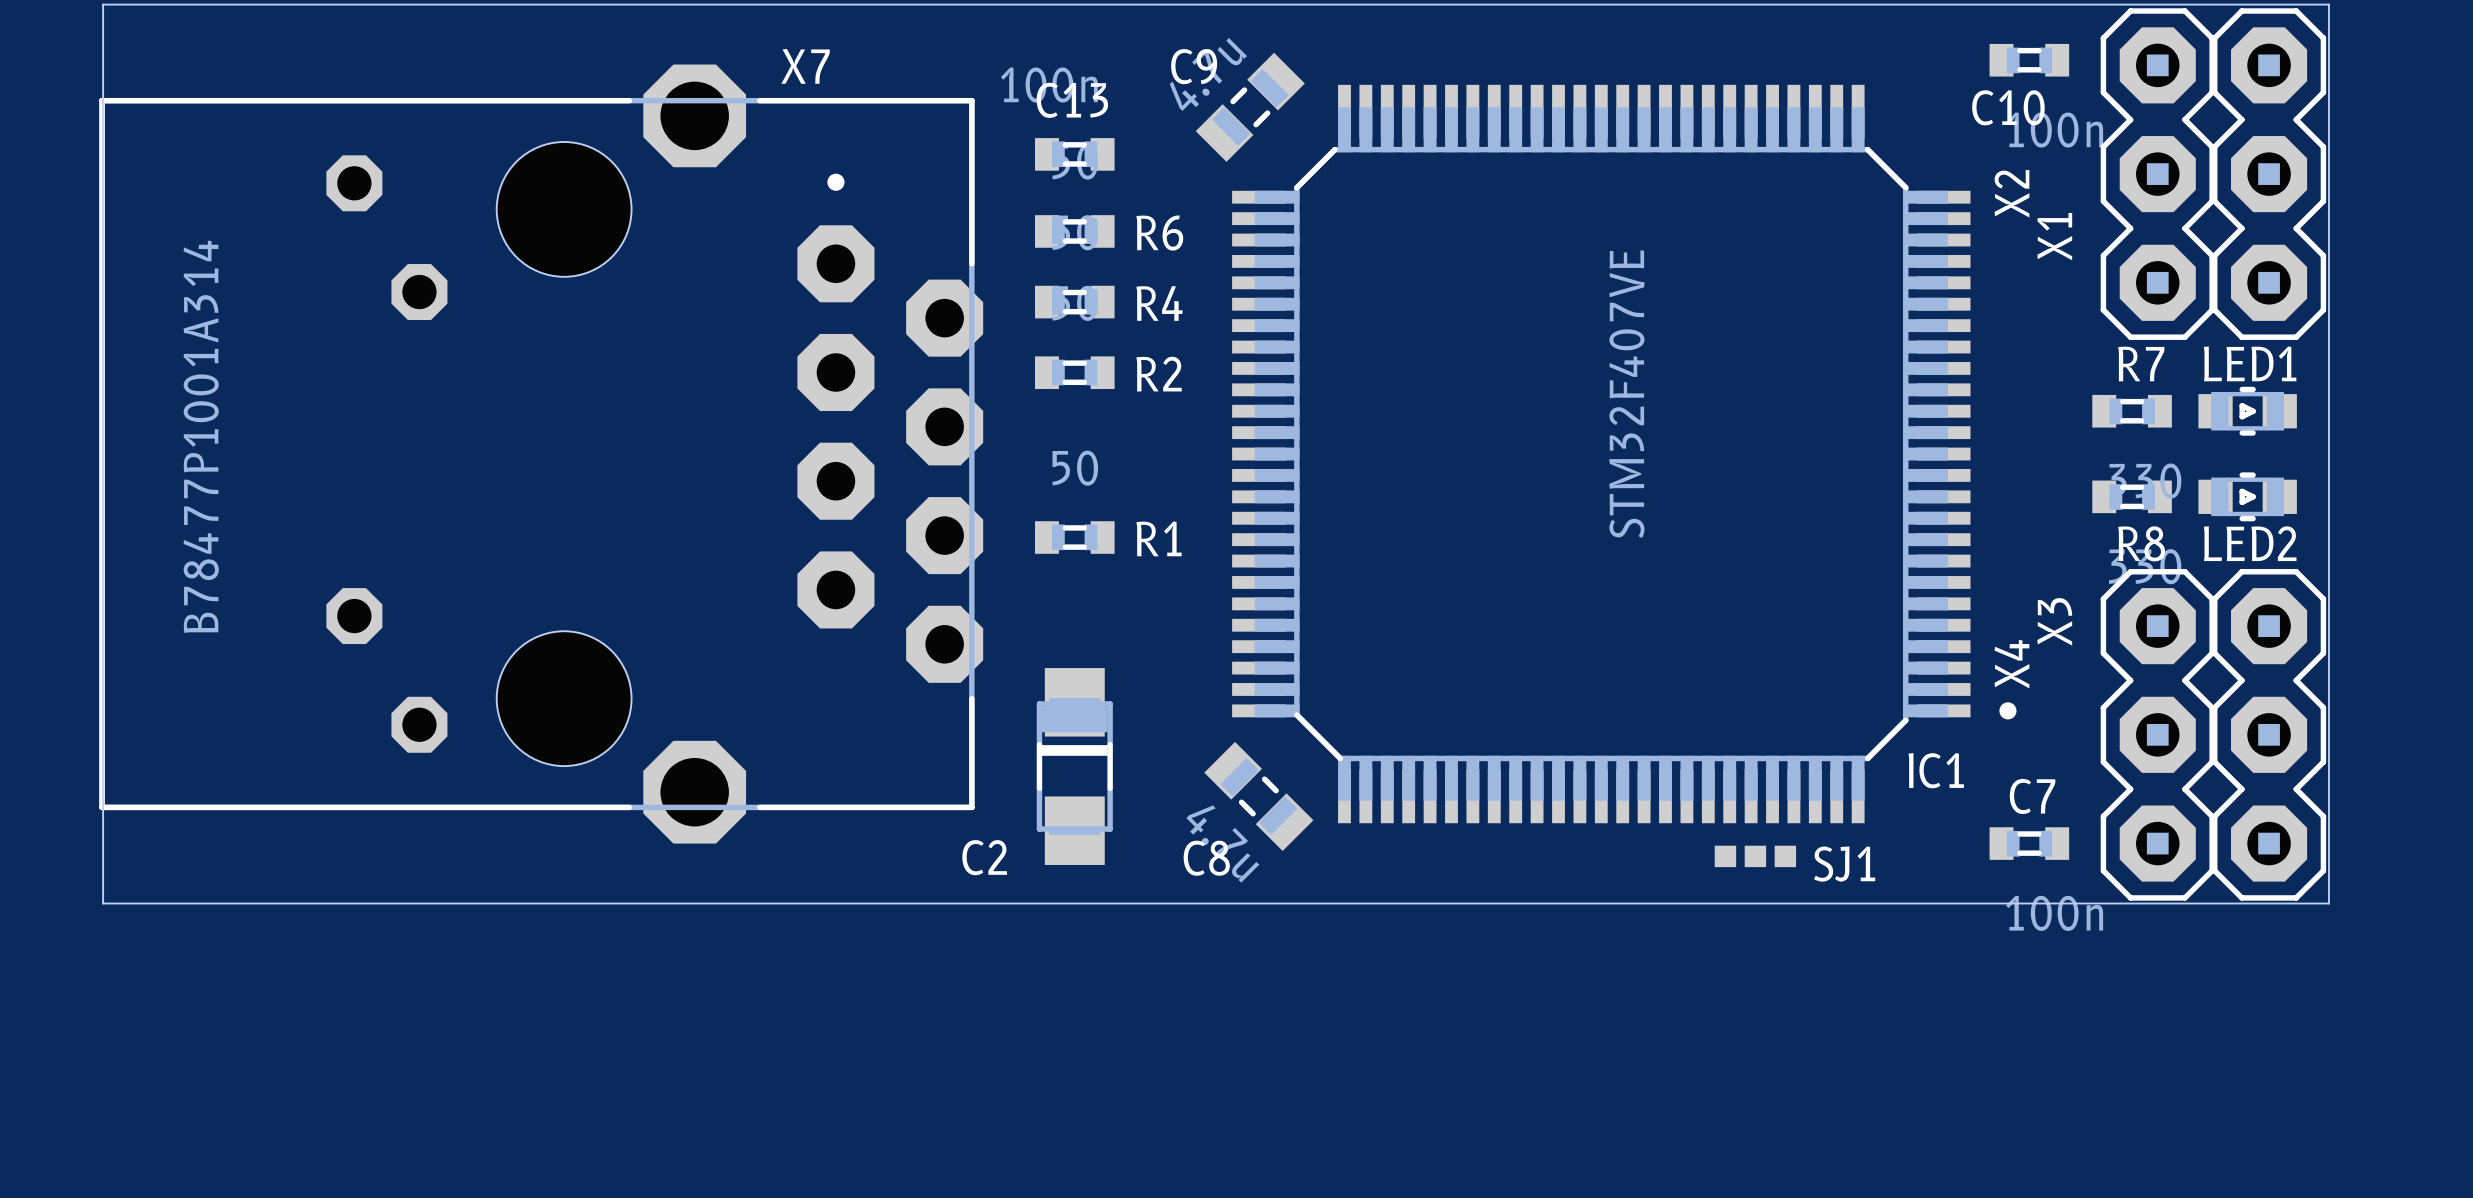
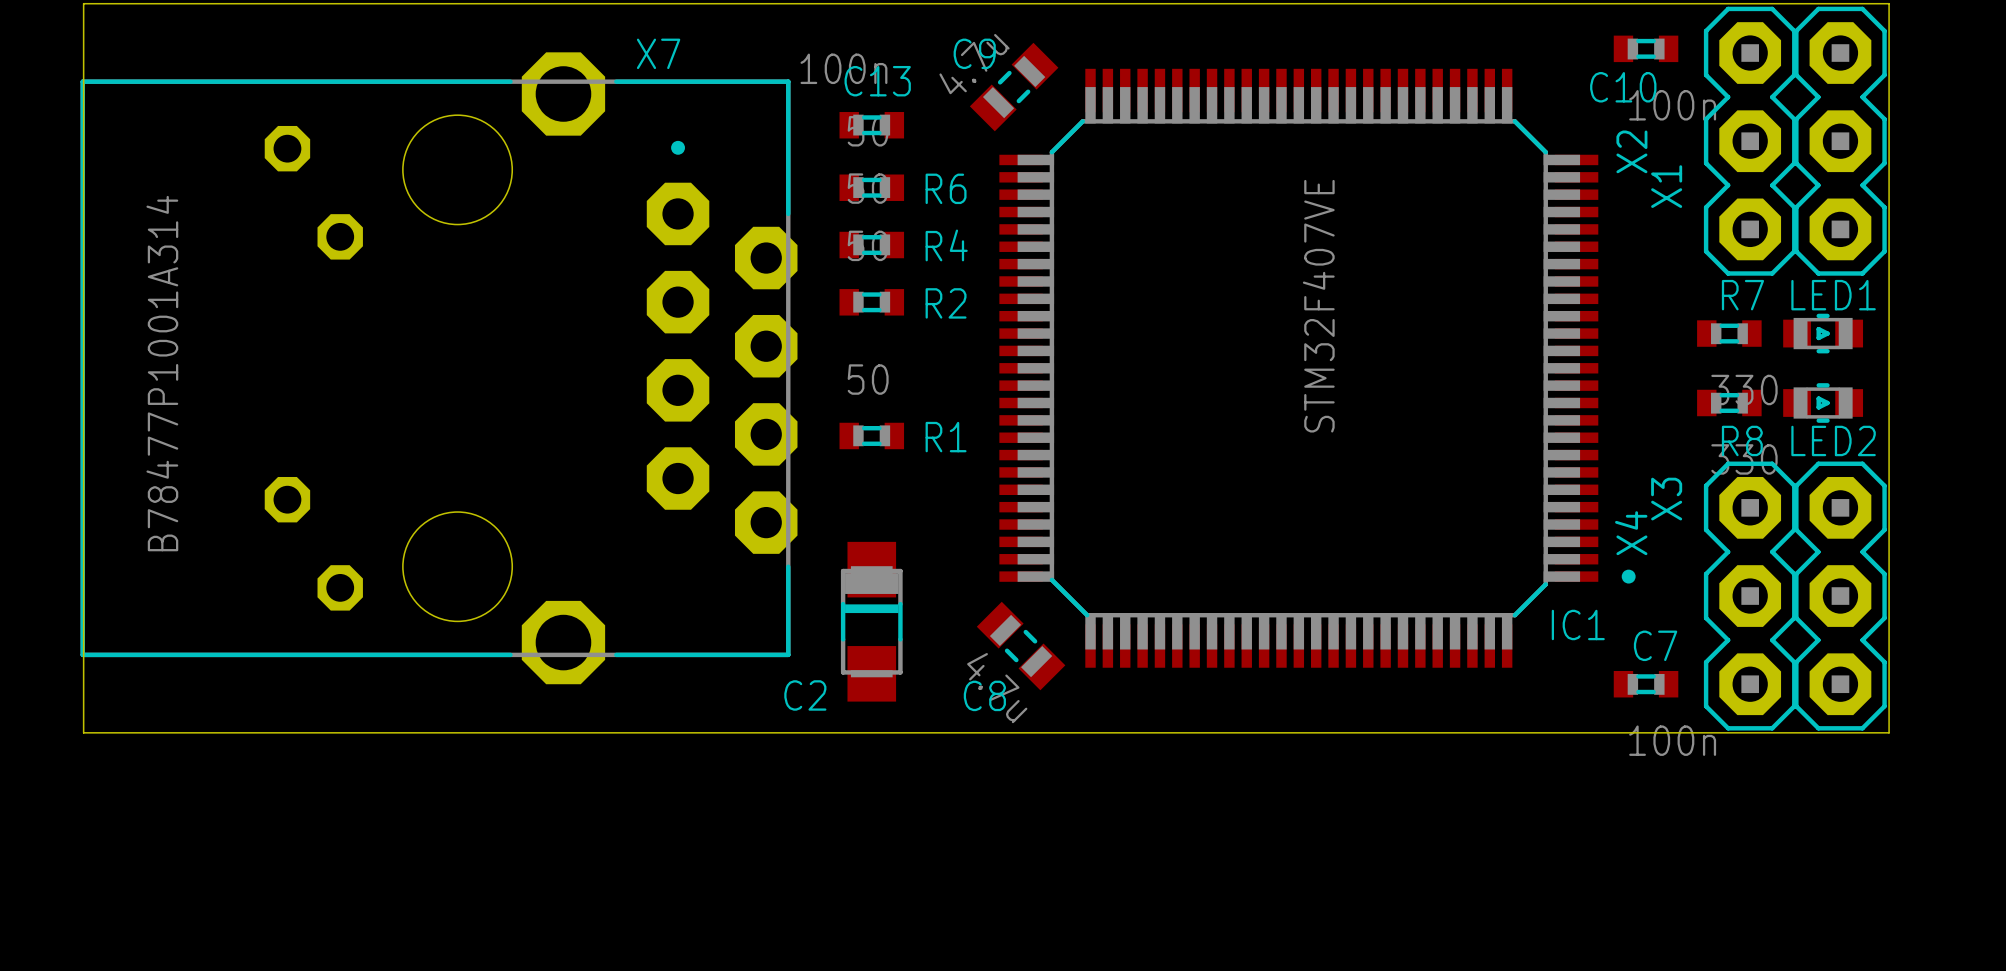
SJ1: (1755, 856) -> none

